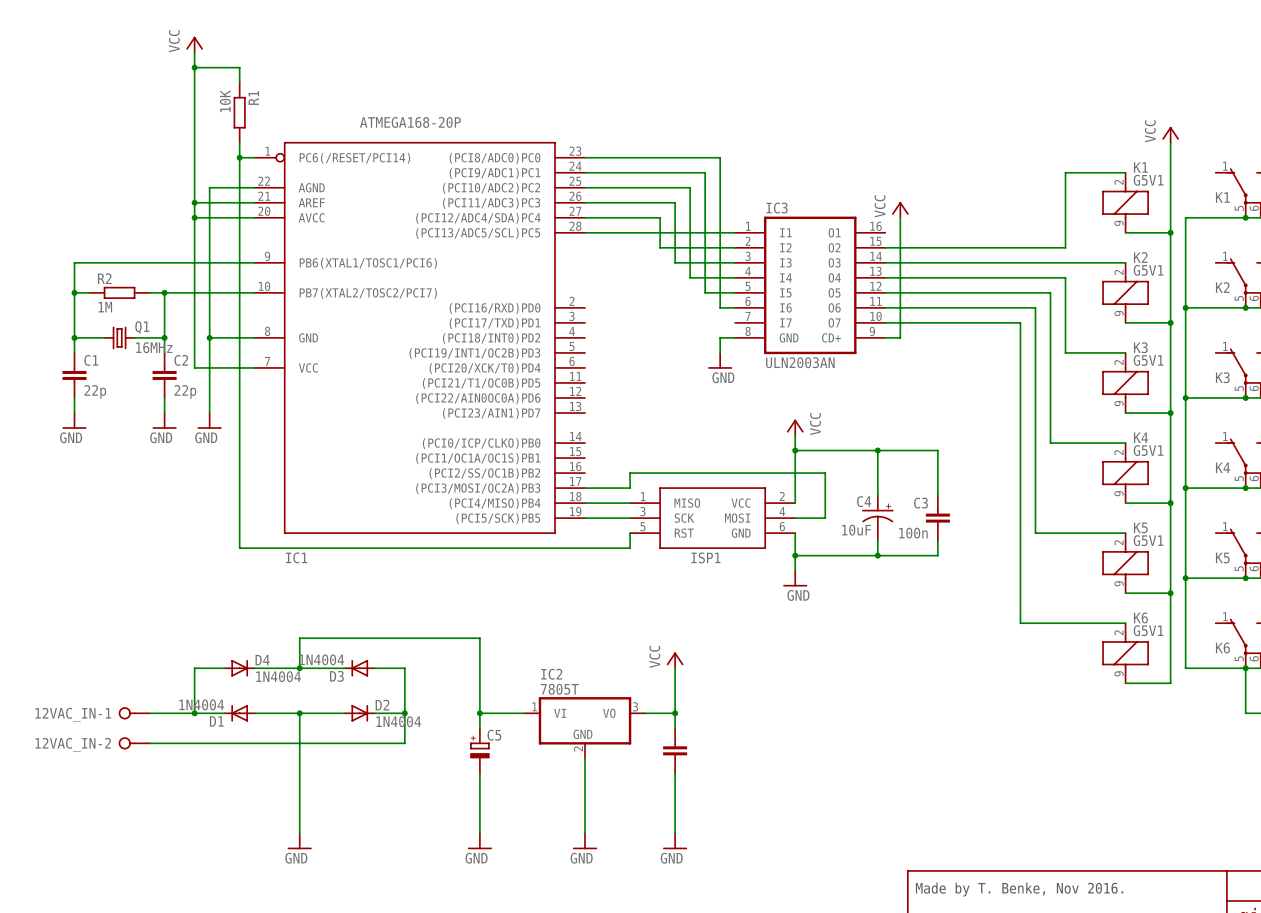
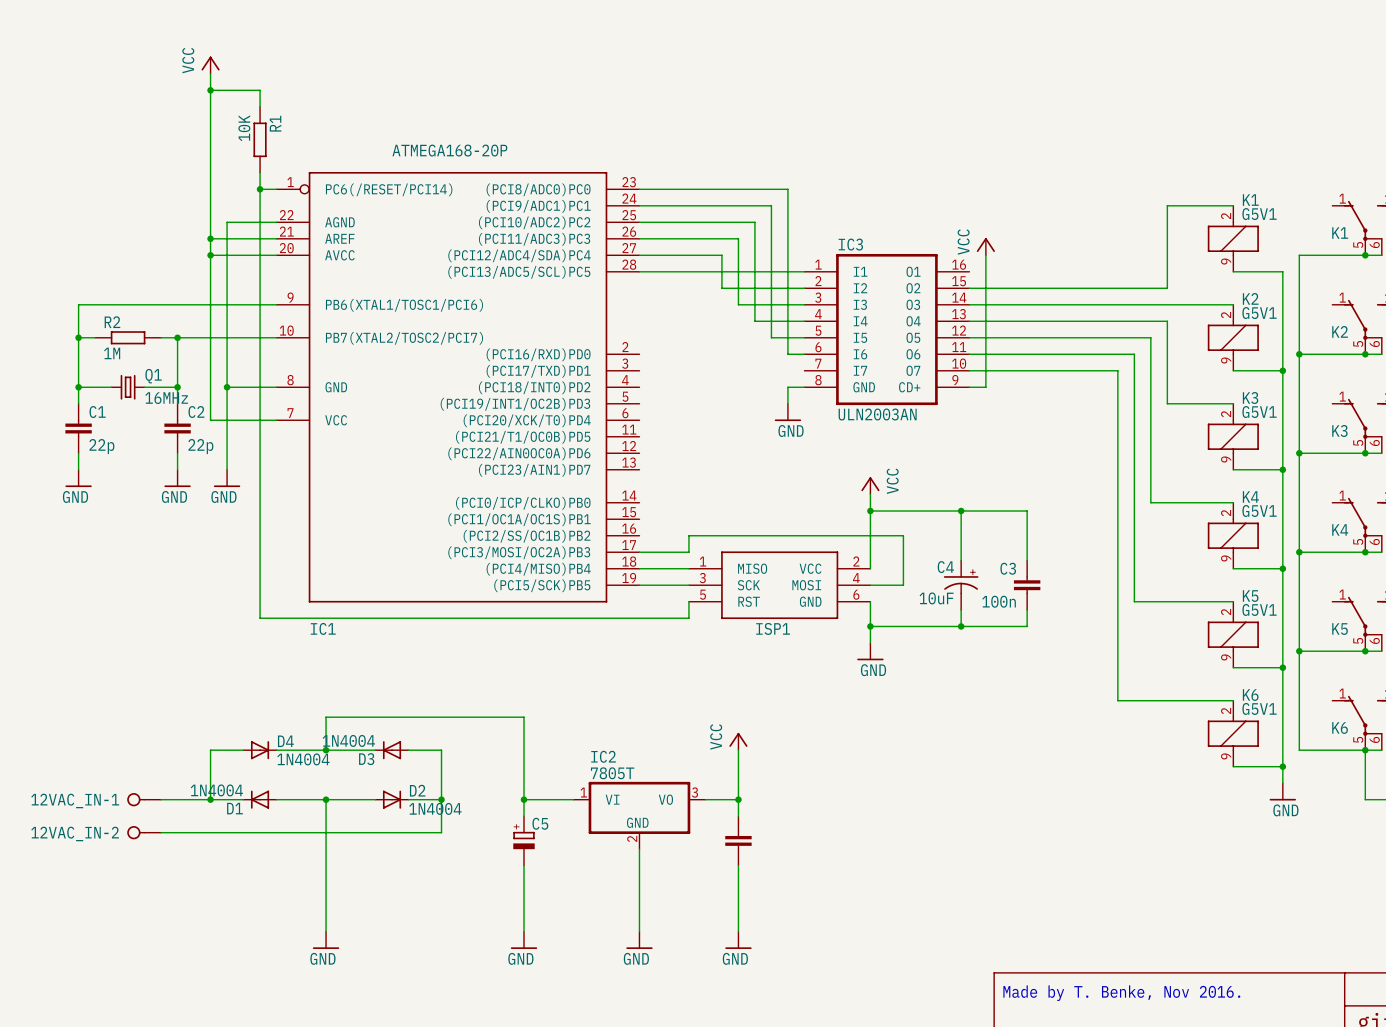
power symbol: VCC (1170, 134) -> none
wire: (1170, 142) (1170, 232) -> none
junction: (1170, 232) -> none
wire: none -> (1282, 766) (1282, 783)
junction: none -> (1282, 766)
power symbol: none -> GND (1282, 791)

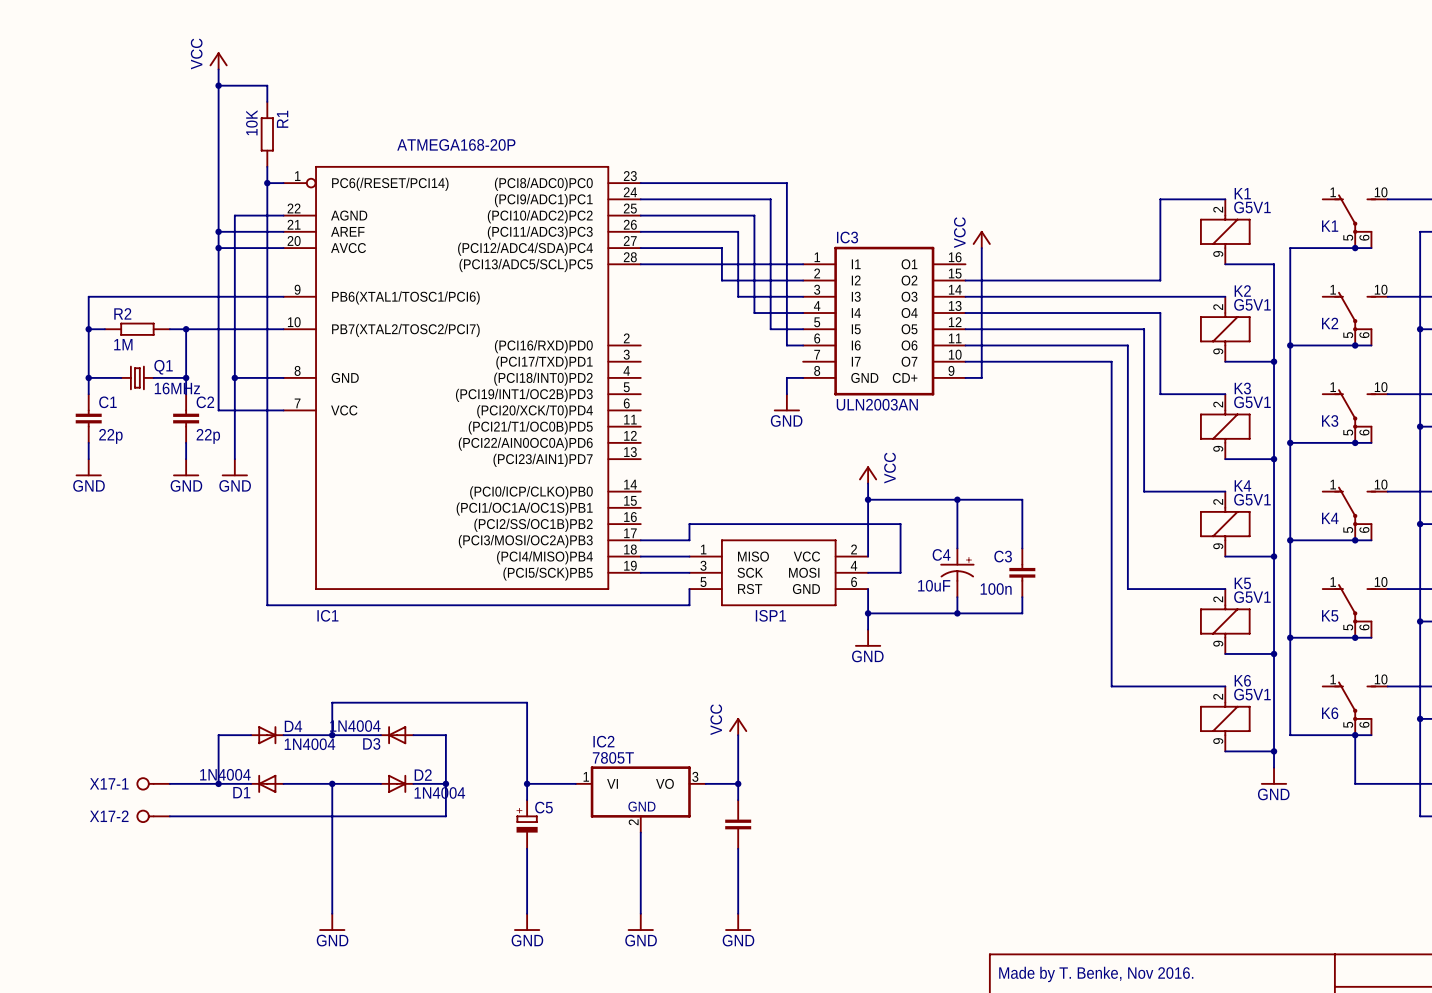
12VAC_IN-1 name: 12VAC_IN-1 (75, 800) -> X17-1 (109, 783)
12VAC_IN-2 name: 12VAC_IN-2 (75, 833) -> X17-2 (109, 816)

